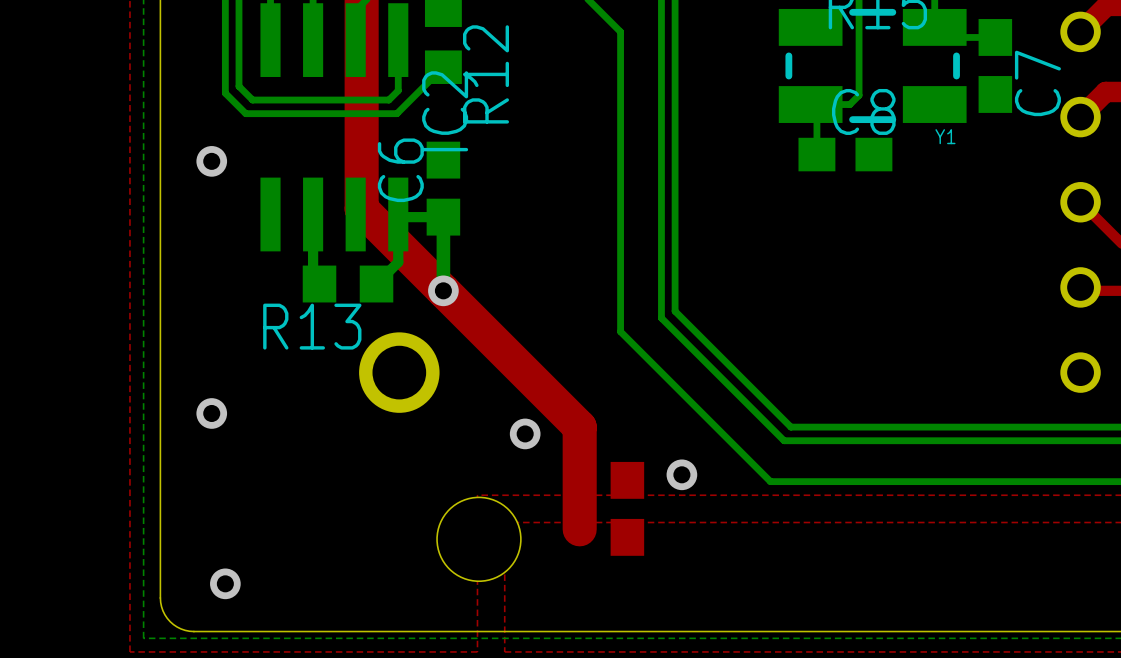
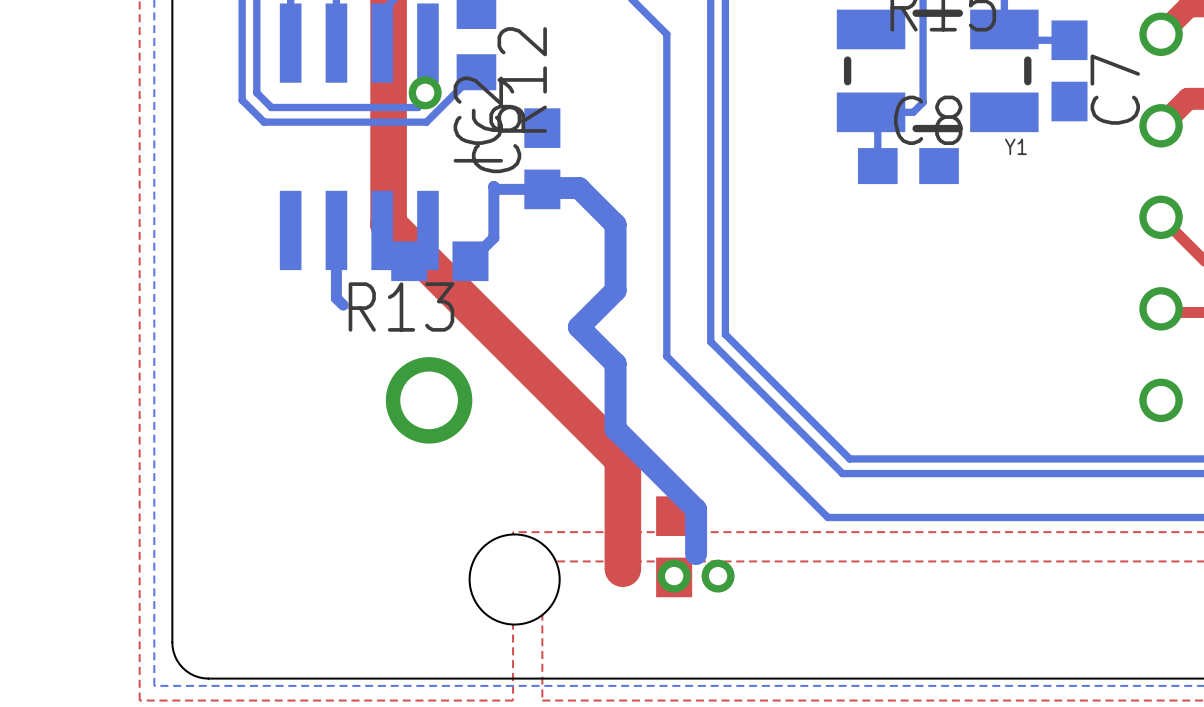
via: none -> (425, 92)
via: (211, 161) -> none
C6 position: (443, 188) -> (542, 158)
bottom track: none -> (470, 261) (493, 237) (493, 186) (496, 189) (578, 188) (615, 224) (615, 290) (578, 327) (615, 363) (615, 429)
R13 position: (348, 284) -> (439, 261)
bottom track: (376, 284) (398, 262) (398, 214) (400, 217) (443, 217) (443, 290) -> none
via: (443, 290) -> none
bottom track: none -> (616, 429) (696, 509) (696, 554)
via: (211, 413) -> none
via: (525, 433) -> none
via: (681, 474) -> none
via: none -> (674, 576)
via: none -> (718, 576)
via: (225, 583) -> none

